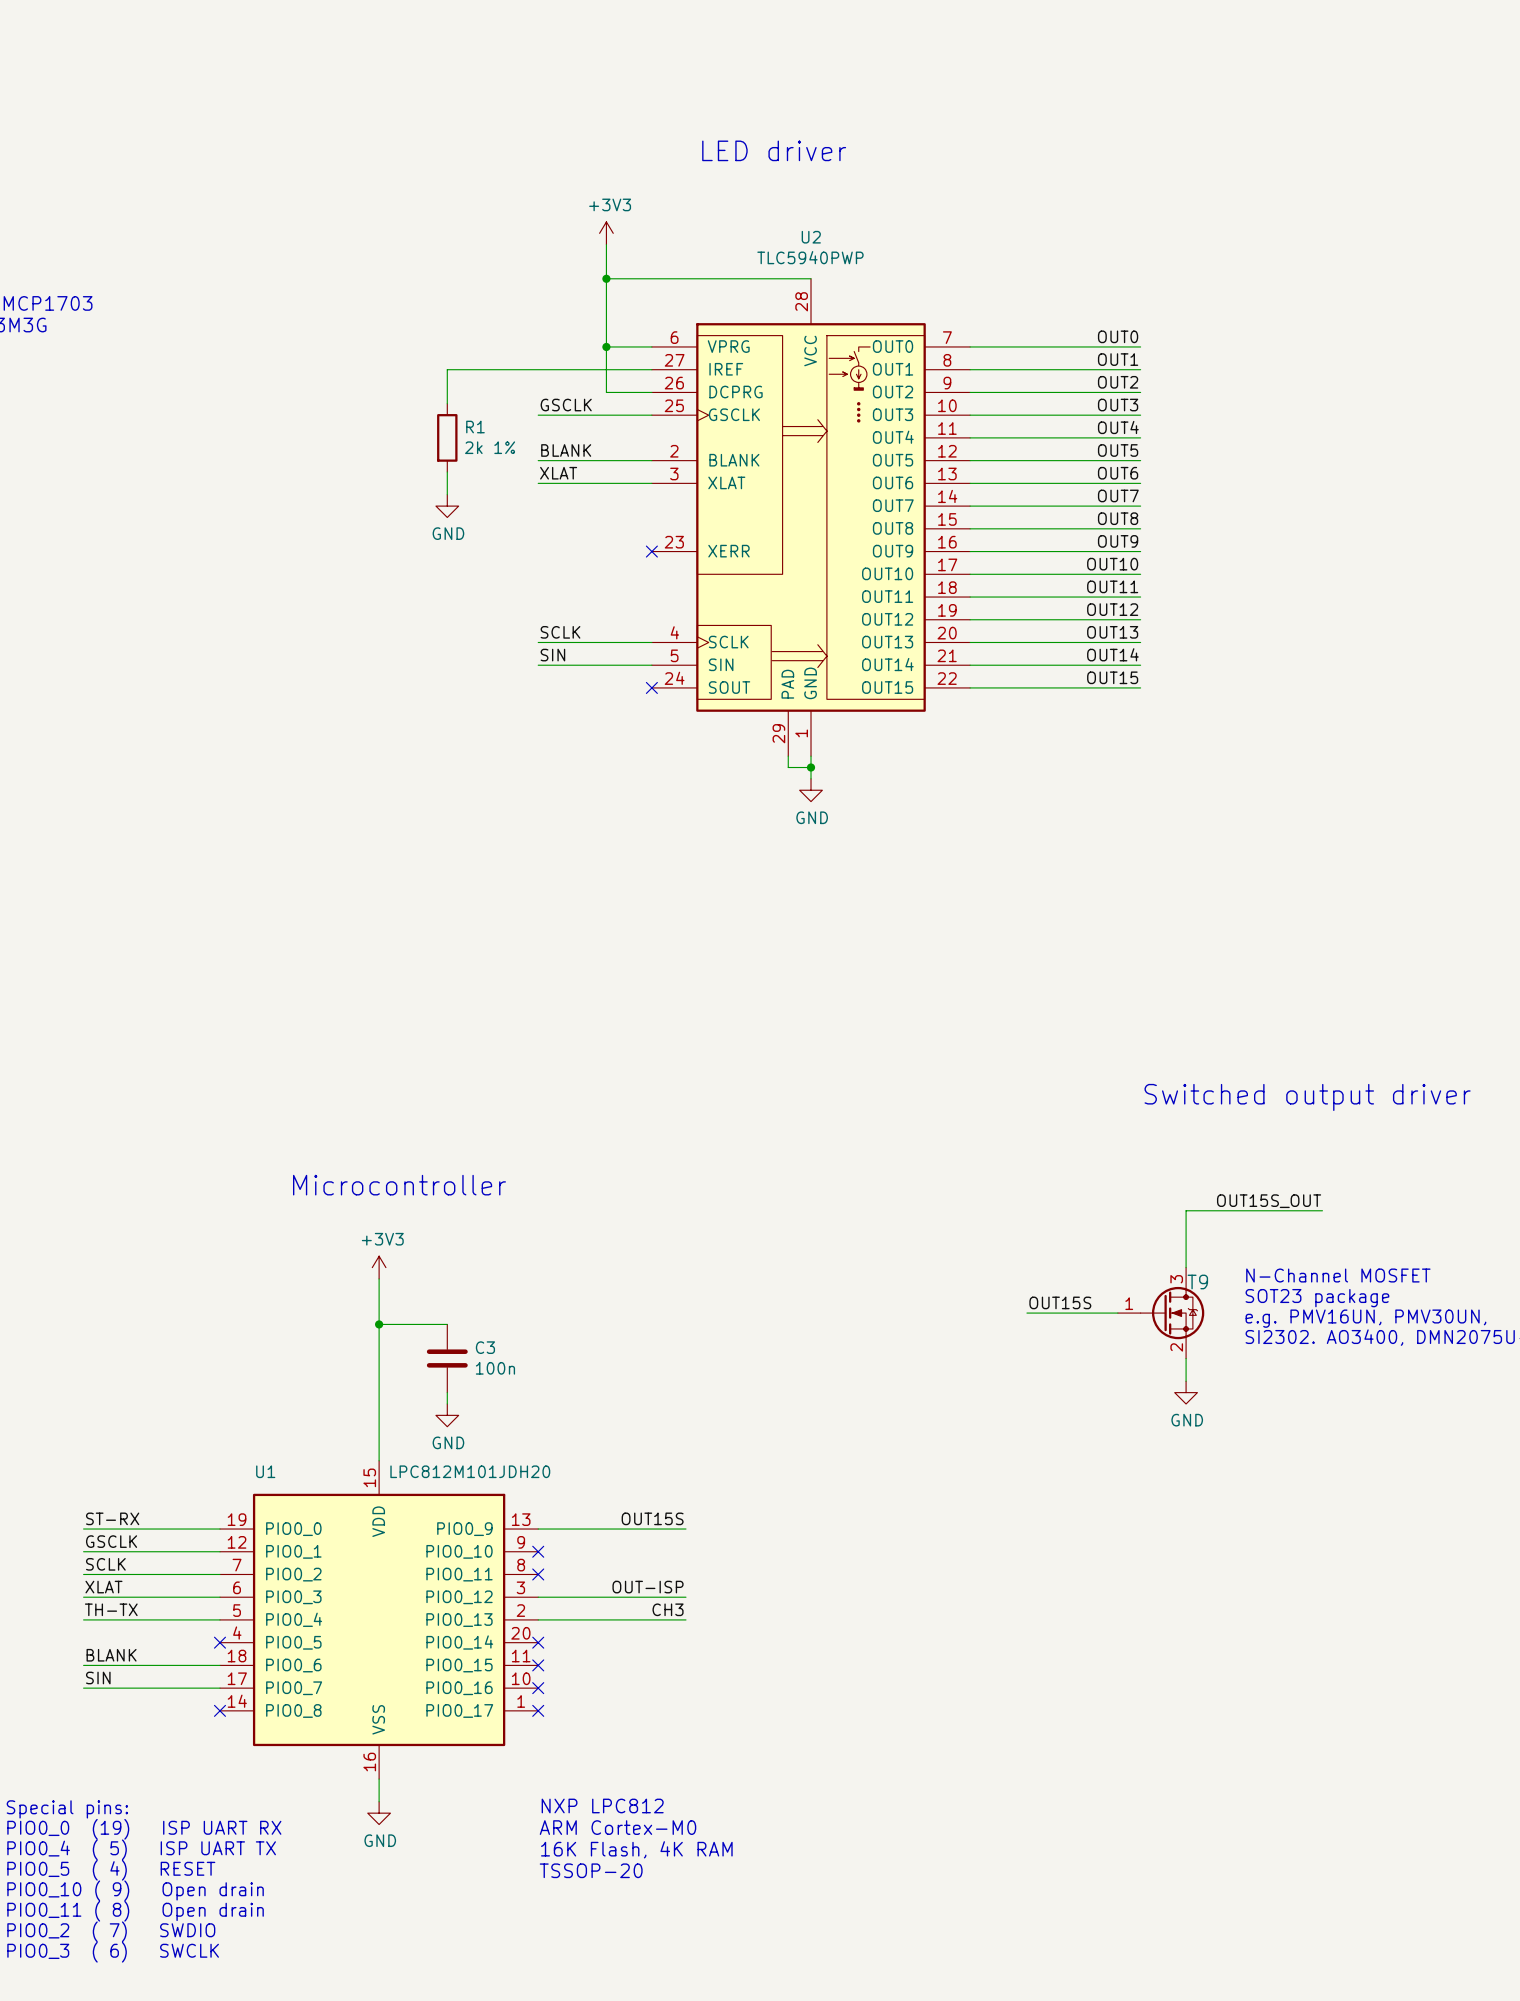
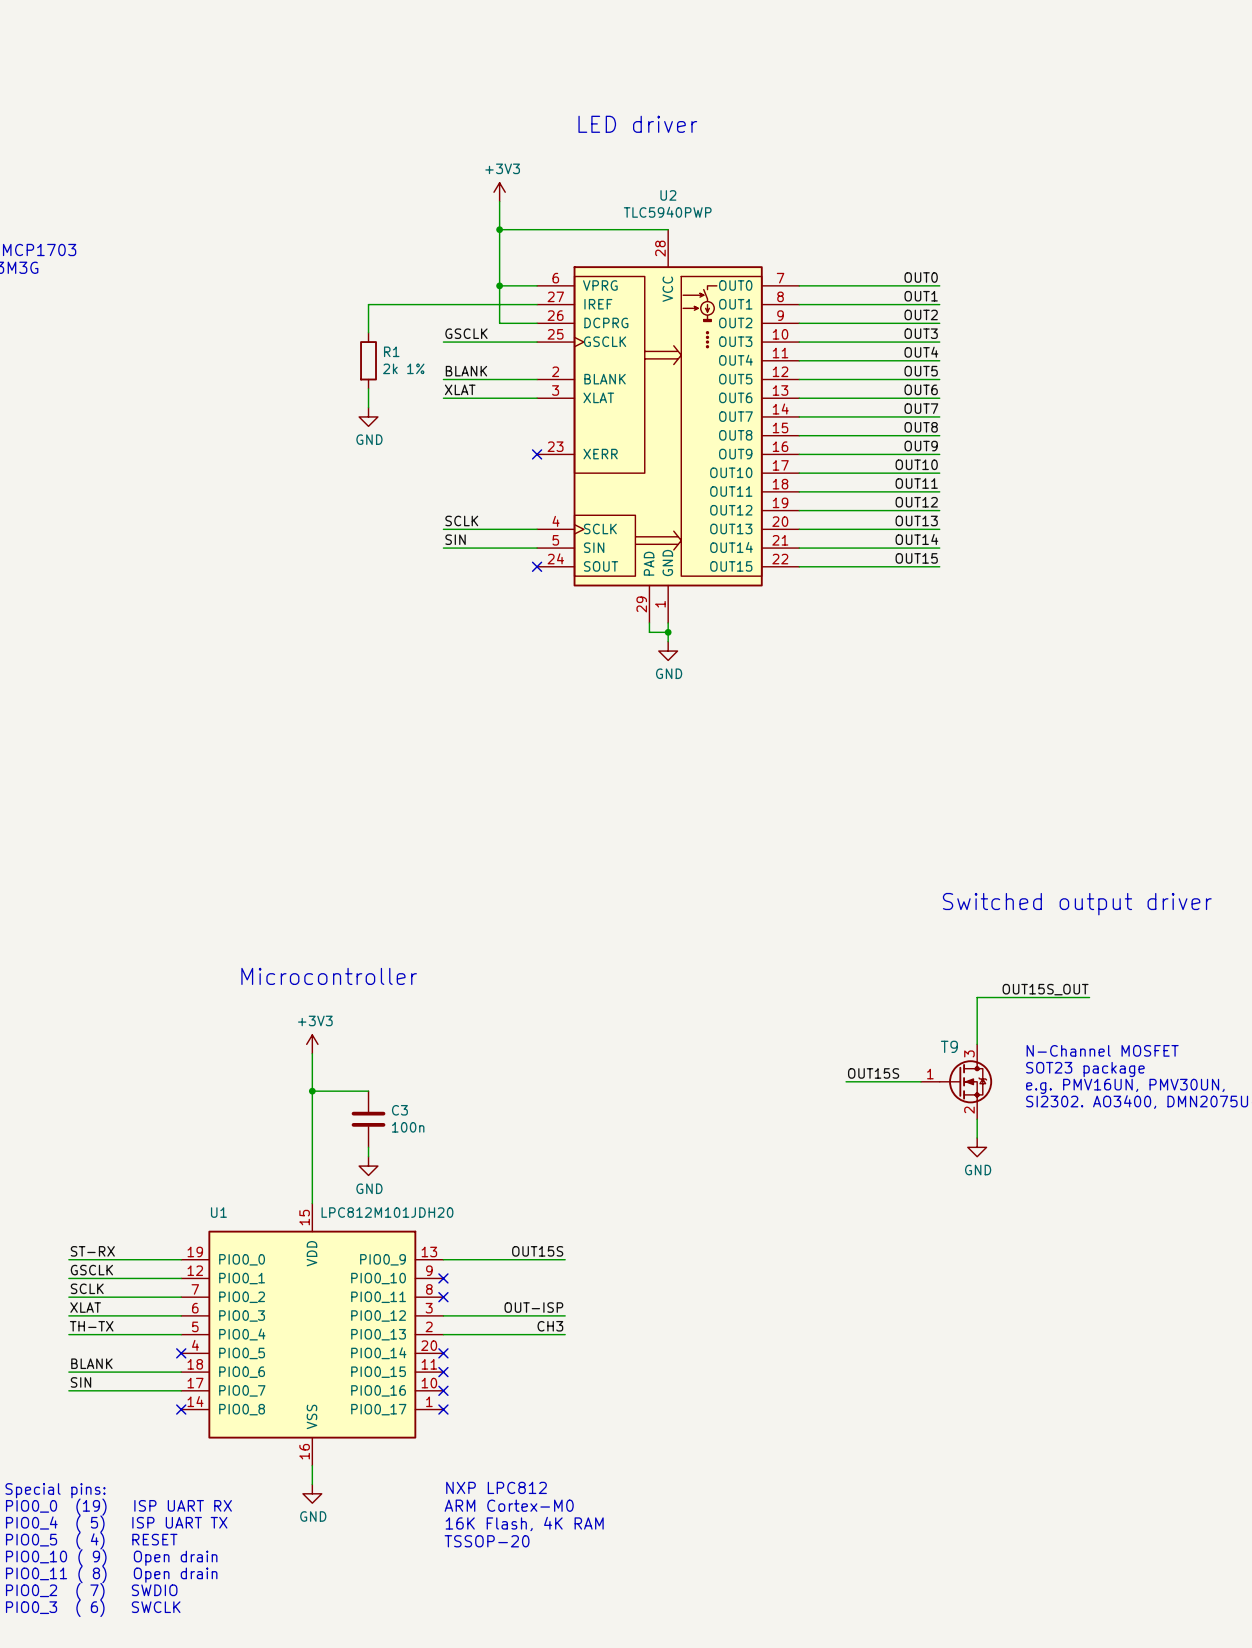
T9 name position: T9 (1197, 1281) -> T9 (949, 1046)

